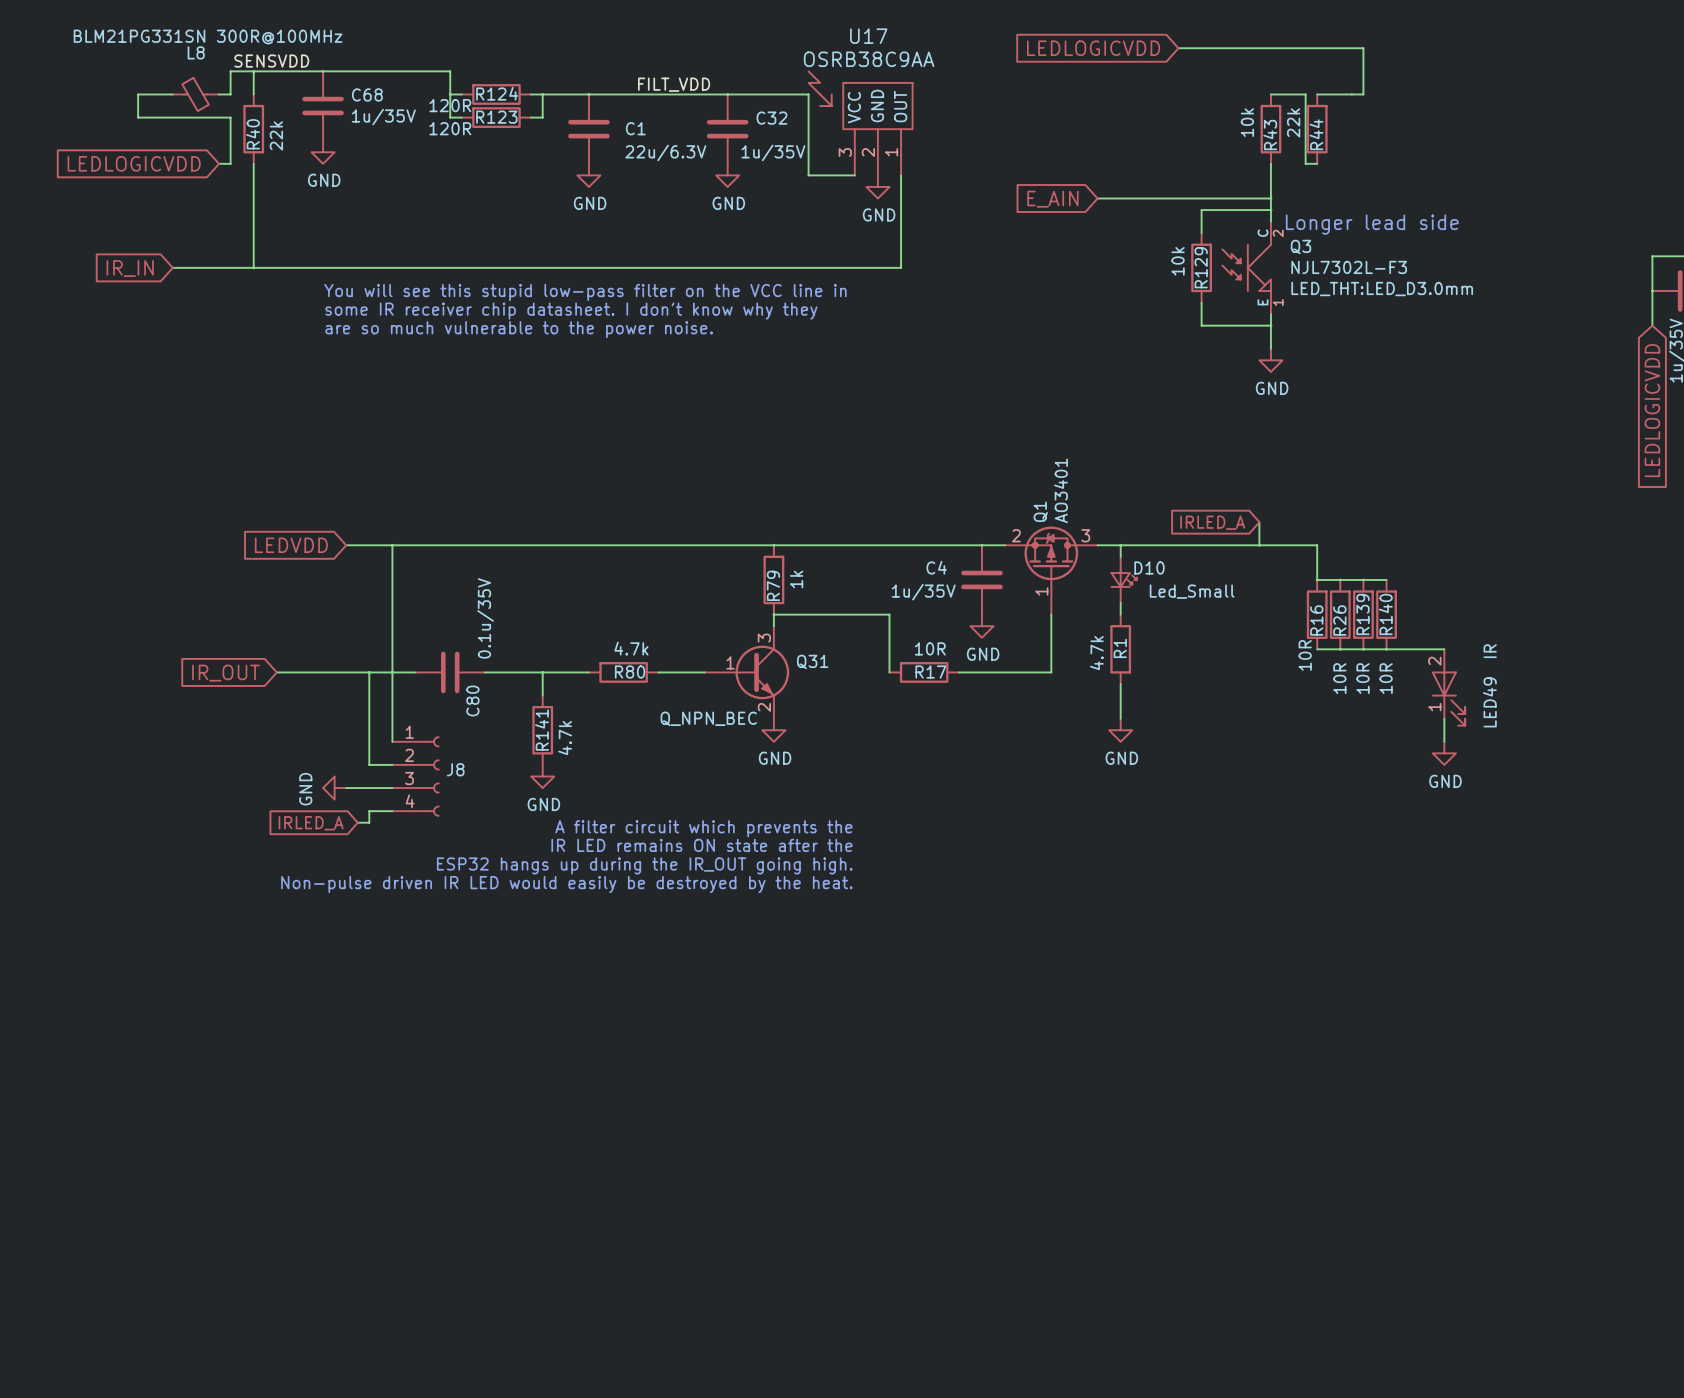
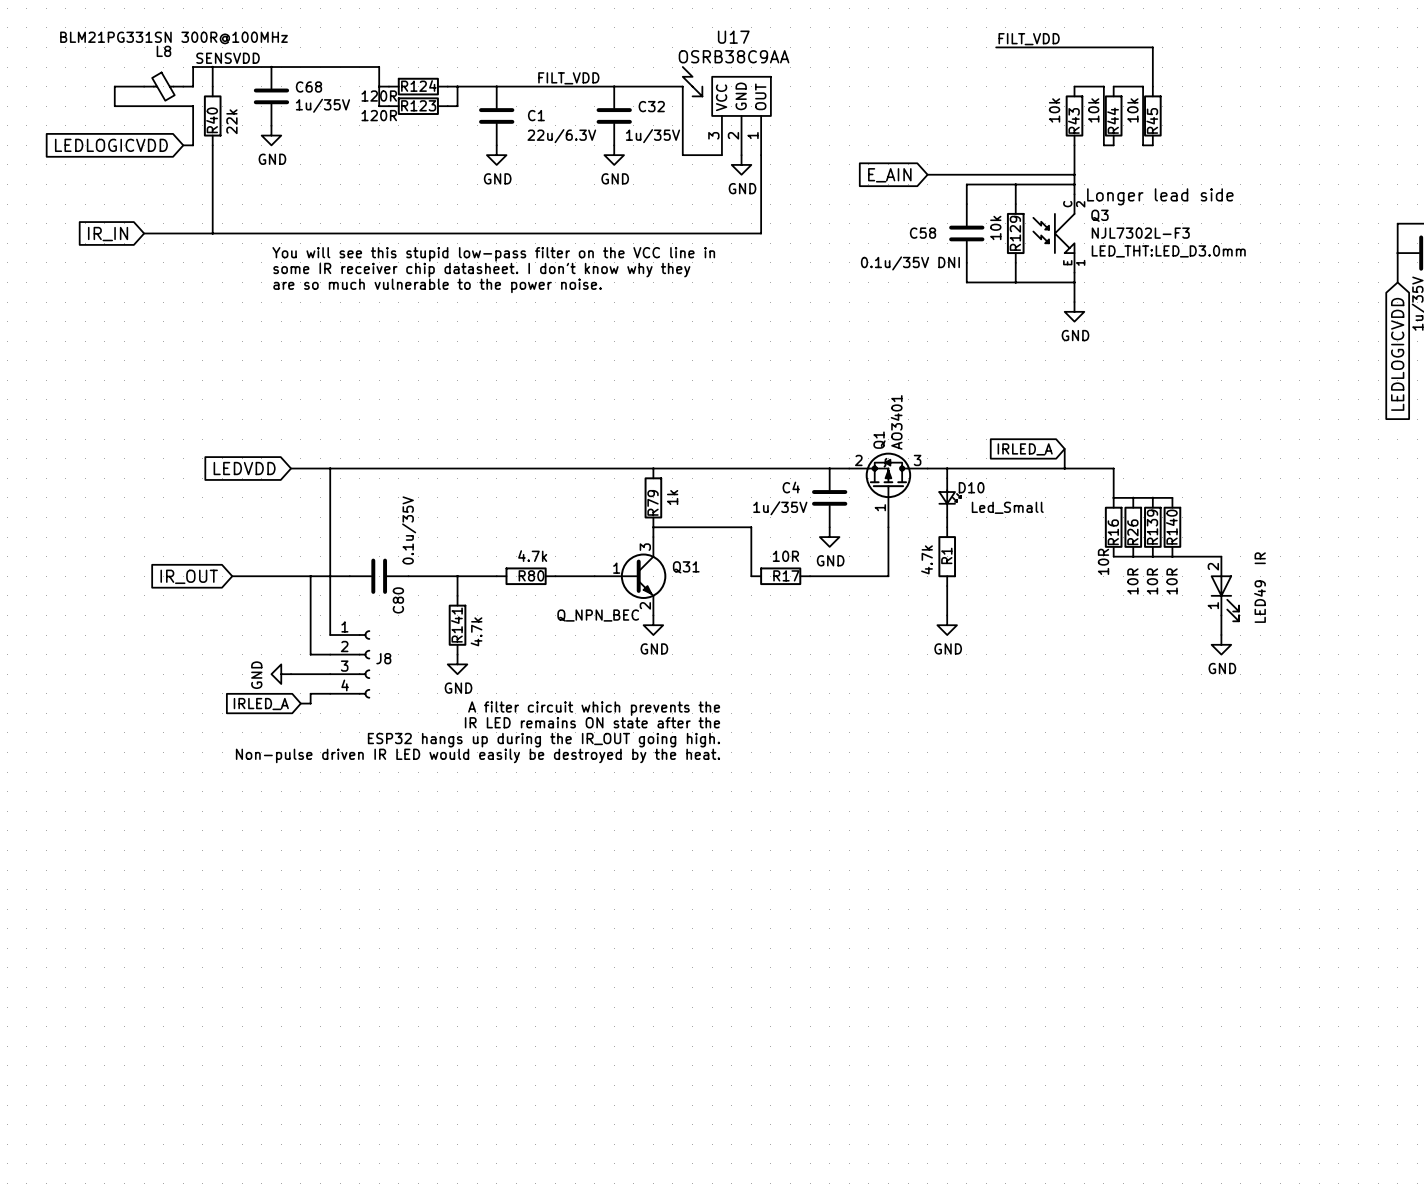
label: none -> FILT_VDD (1029, 39)
global label: LEDLOGICVDD (1093, 48) -> none
wire: (1351, 94) (1363, 94) -> (1143, 86) (1143, 145) (1152, 145)
R44 value: 22k (1293, 122) -> 10k (1093, 110)
R45: none -> 10k (1152, 115)
wire: none -> (1015, 184) (966, 184) (966, 204)
C58: none -> 0.1u/35V DNI (966, 233)
wire: none -> (966, 262) (966, 282) (1015, 282)

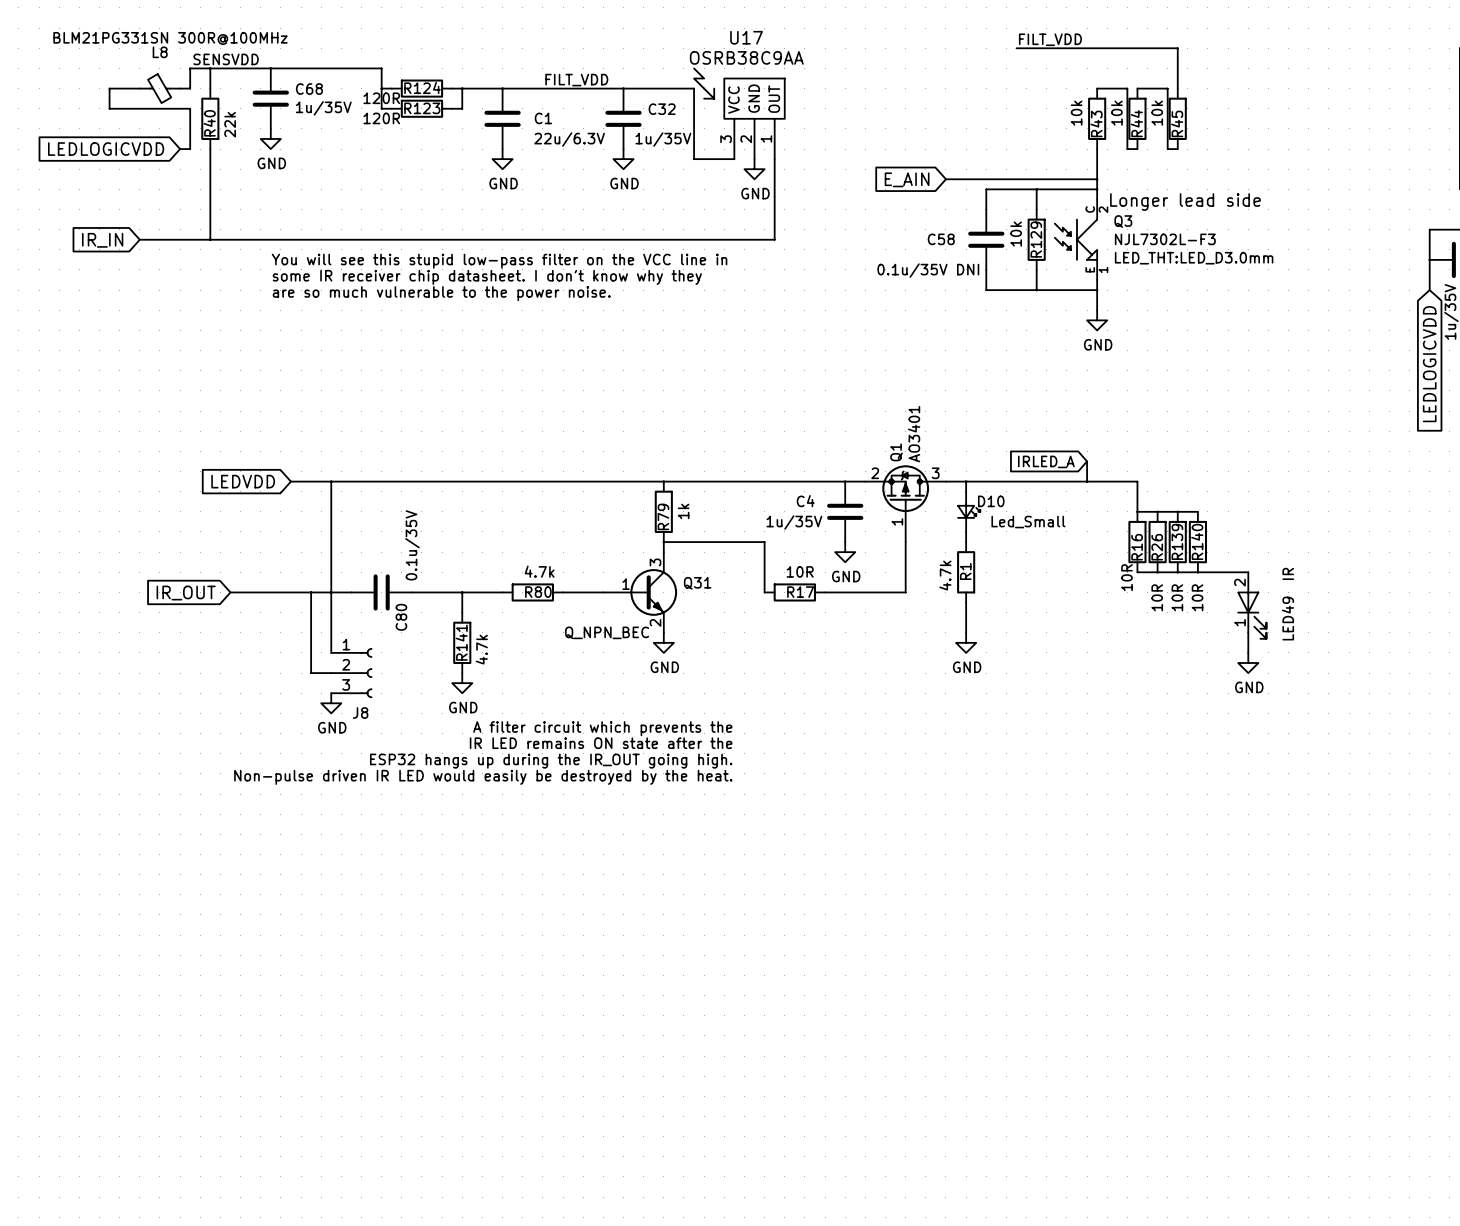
J8 symbol: [330, 630, 370, 699] -> [331, 648, 373, 698]
J8 name position: J8 (383, 658) -> J8 (360, 713)
power symbol rotation: 0° (281, 674) -> 90° counterclockwise (331, 703)
power symbol position: GND (281, 674) -> GND (331, 703)
wire: (291, 674) (330, 674) -> none
wire: (330, 693) (310, 693) (310, 703) (300, 703) -> none
global label: IRLED_A (261, 704) -> none

